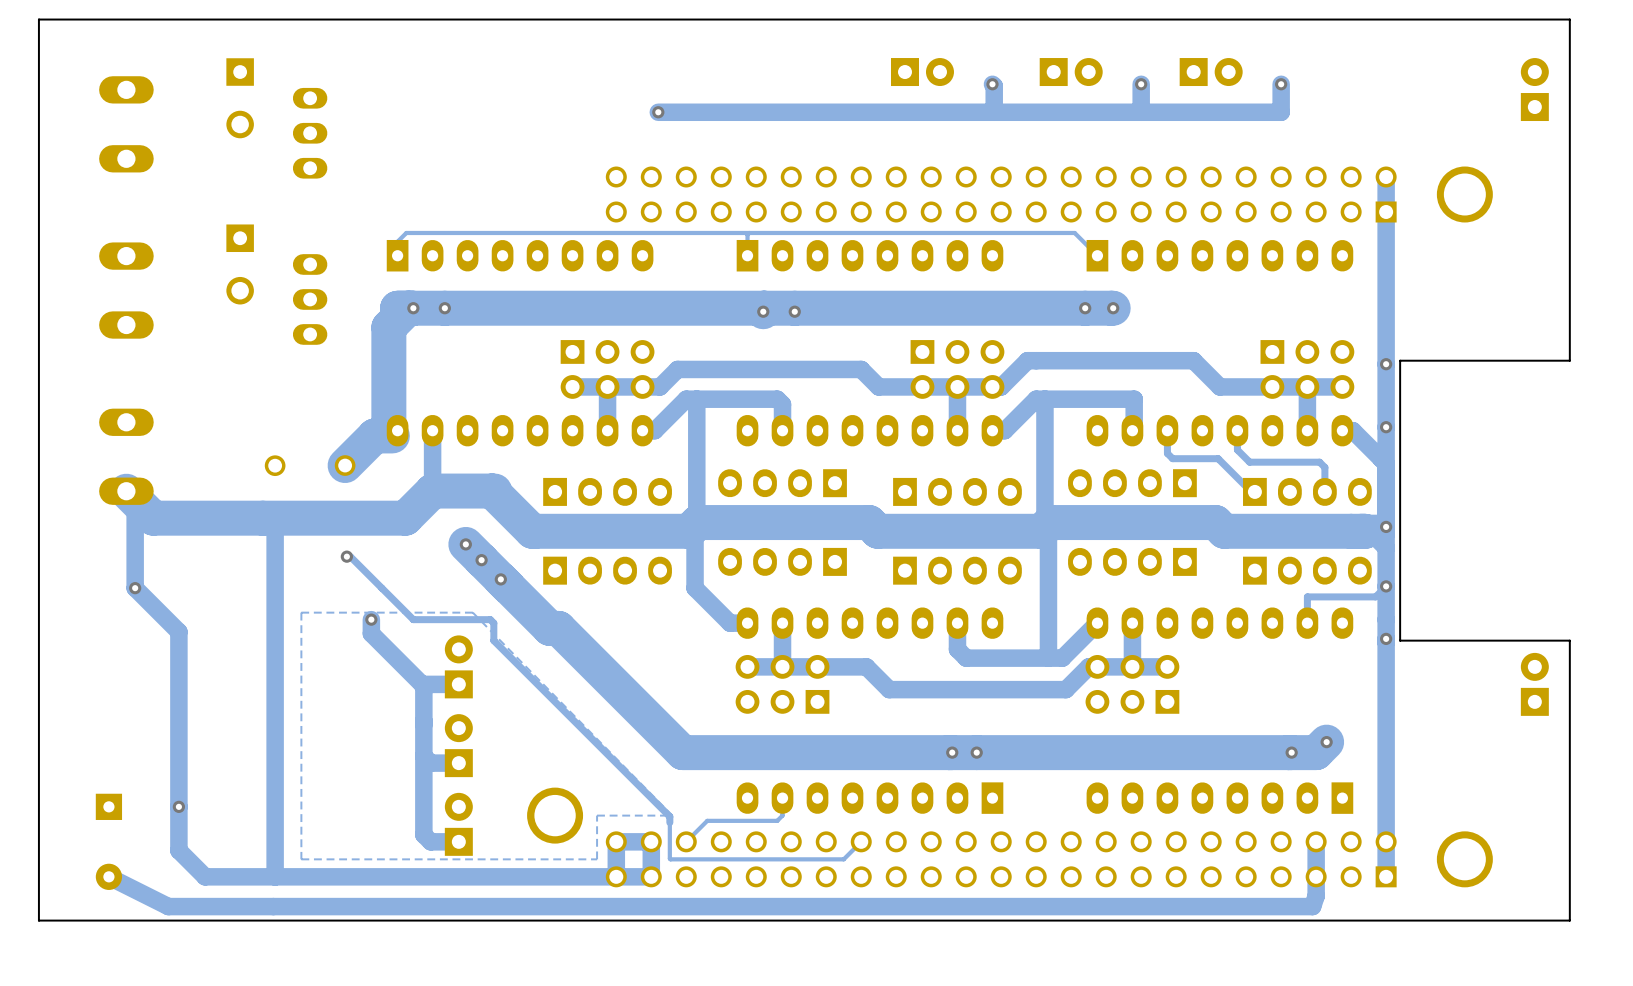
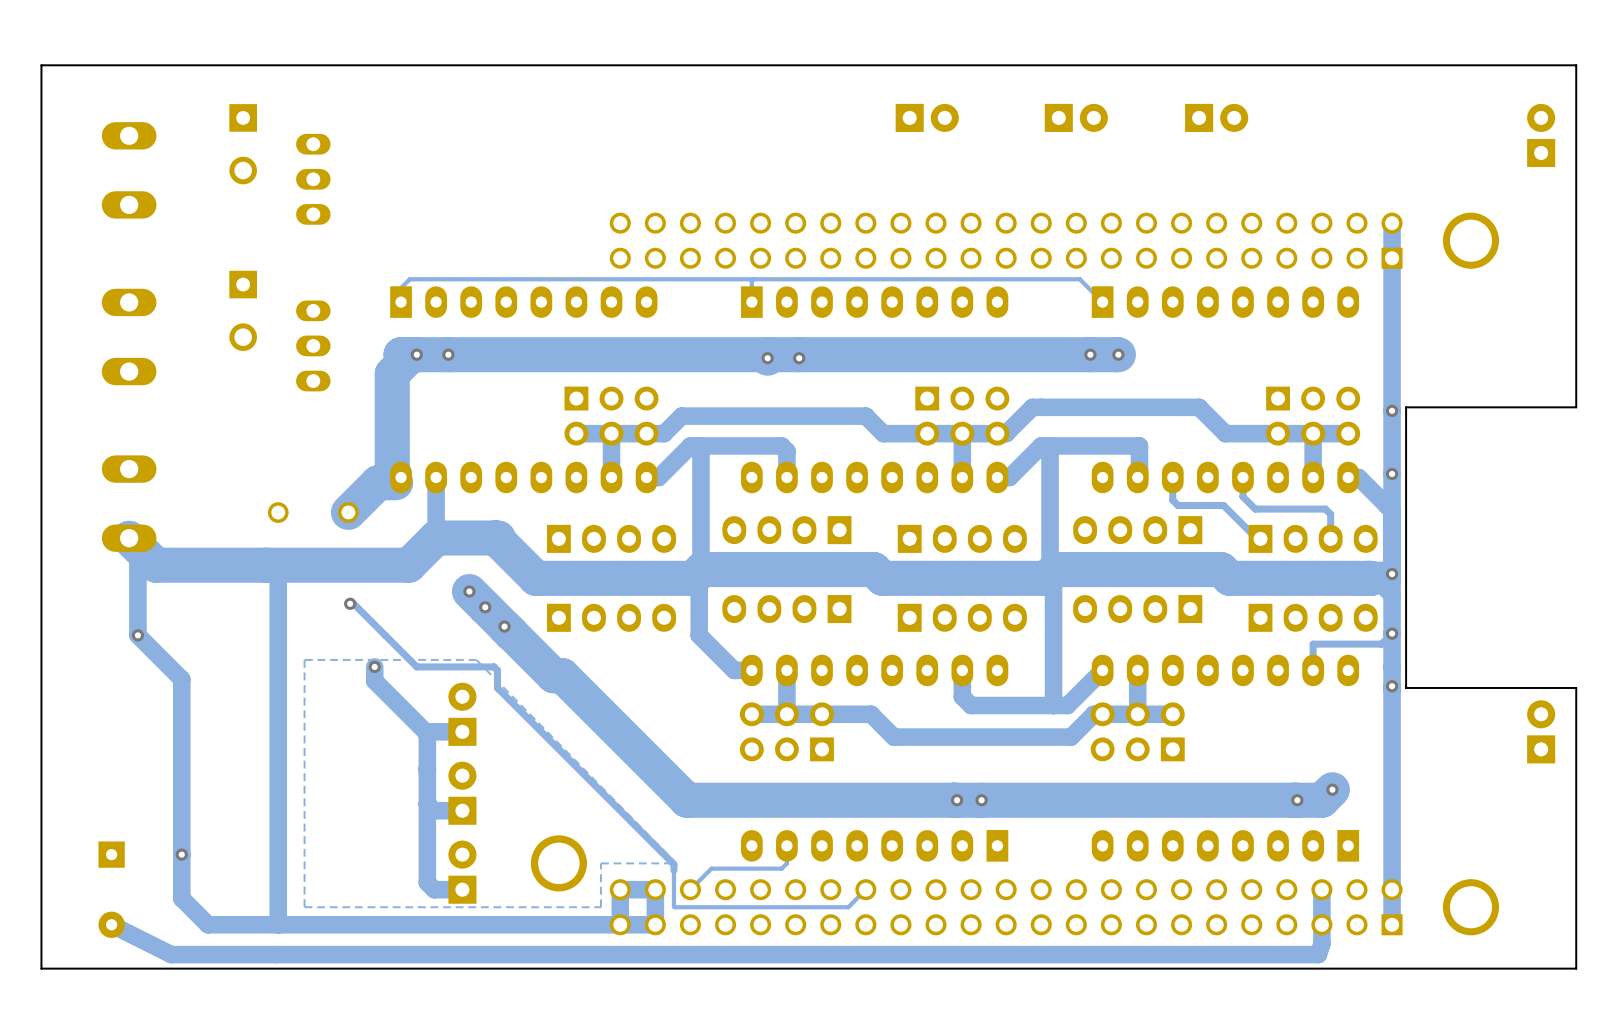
track: (992, 84) (994, 86) (994, 112) -> none
via: (992, 84) -> none
track: (1141, 84) (1141, 112) -> none
via: (1141, 84) -> none
track: (1281, 84) (1281, 112) (658, 112) -> none
via: (1281, 84) -> none
via: (658, 112) -> none

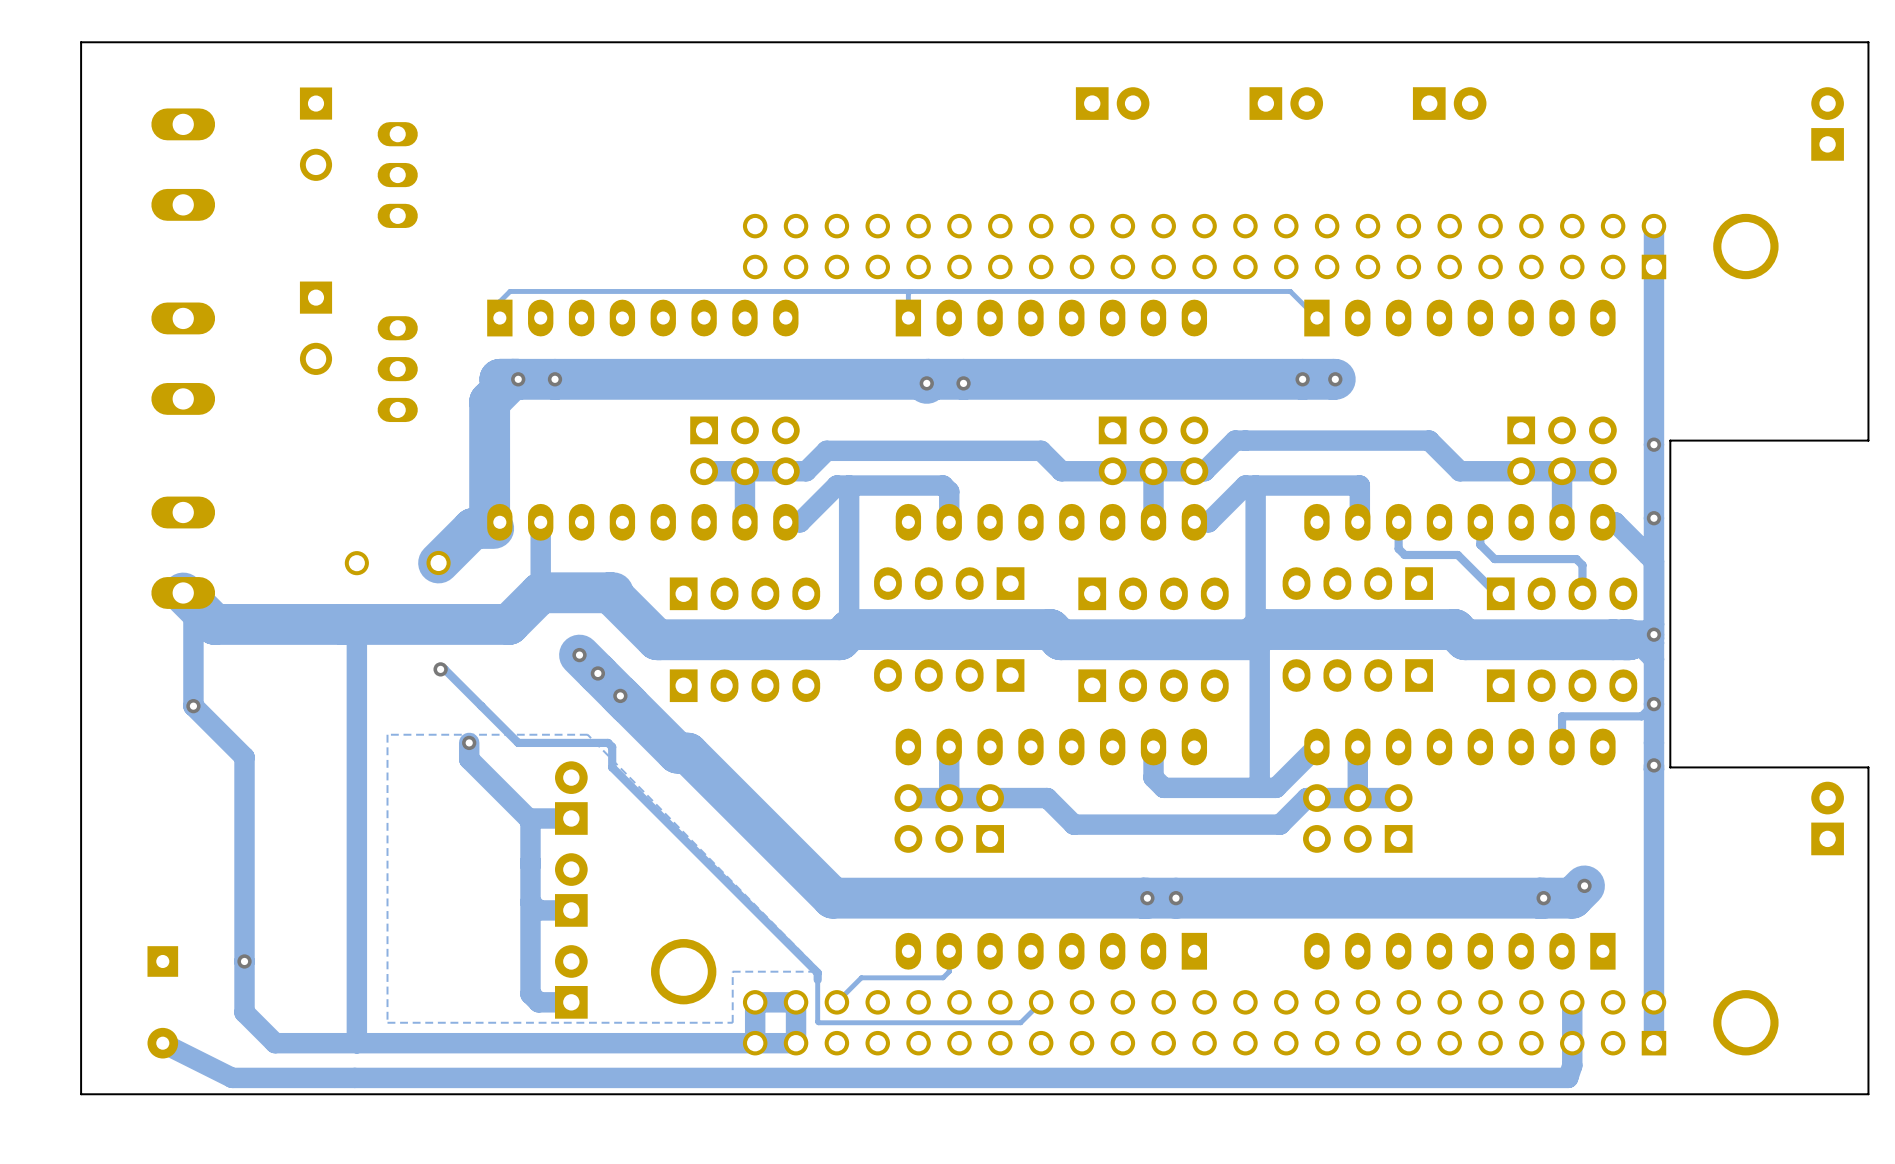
track: (697, 573) (699, 575) (699, 635) (734, 670) (751, 670) -> none

